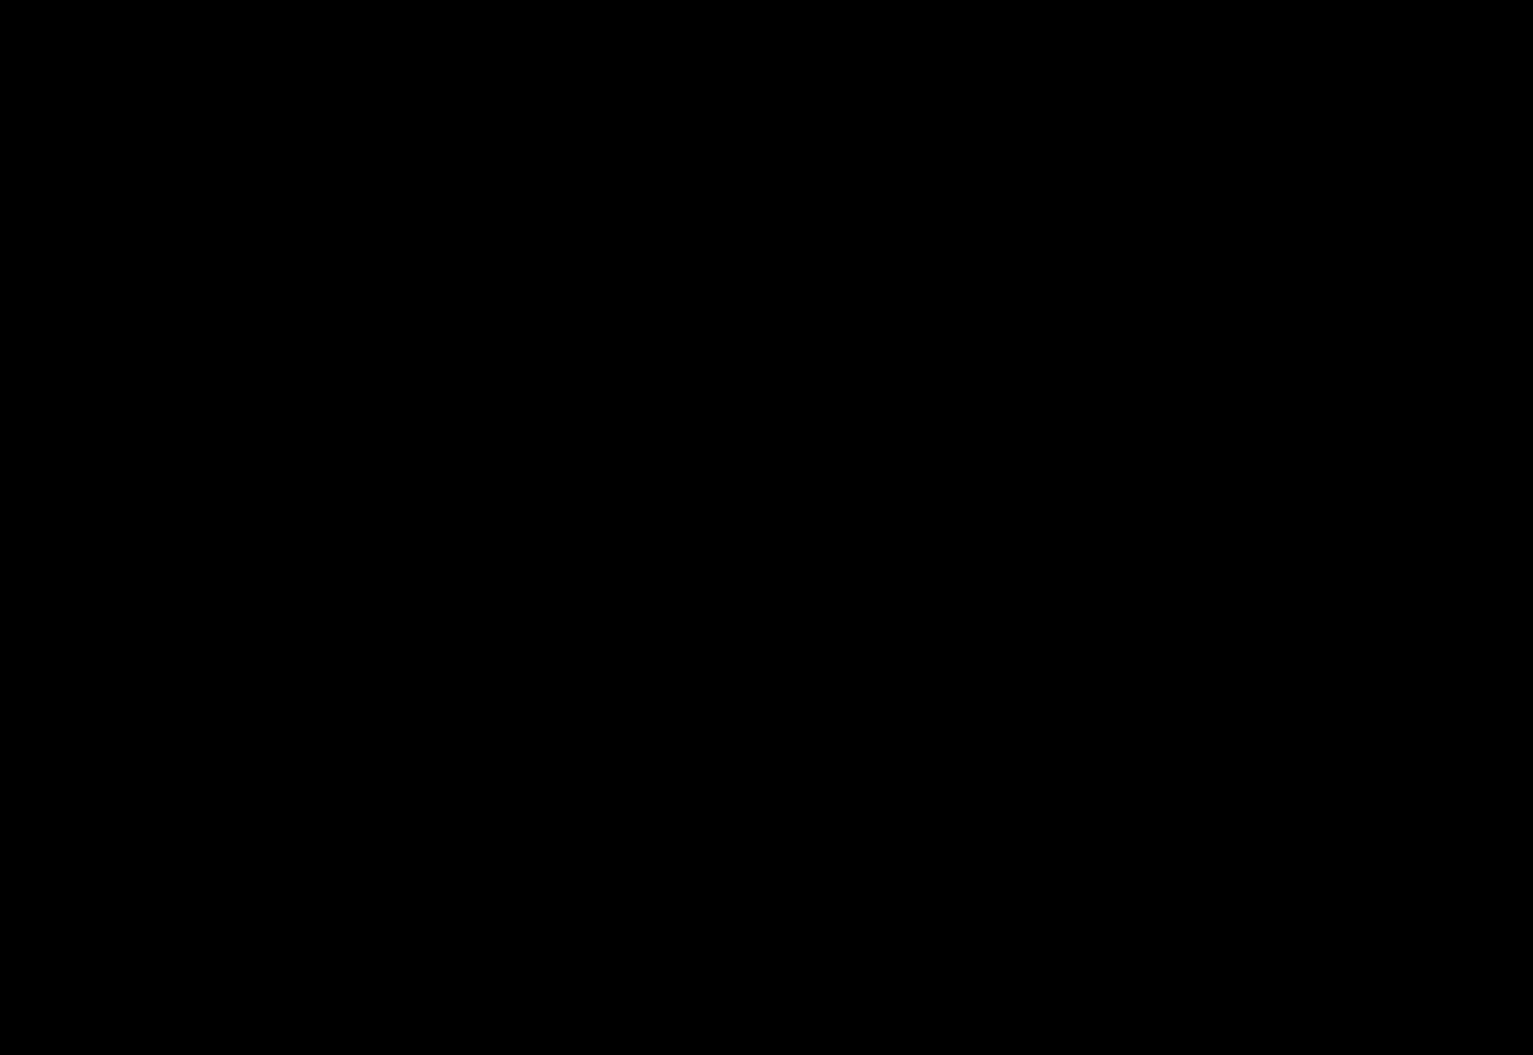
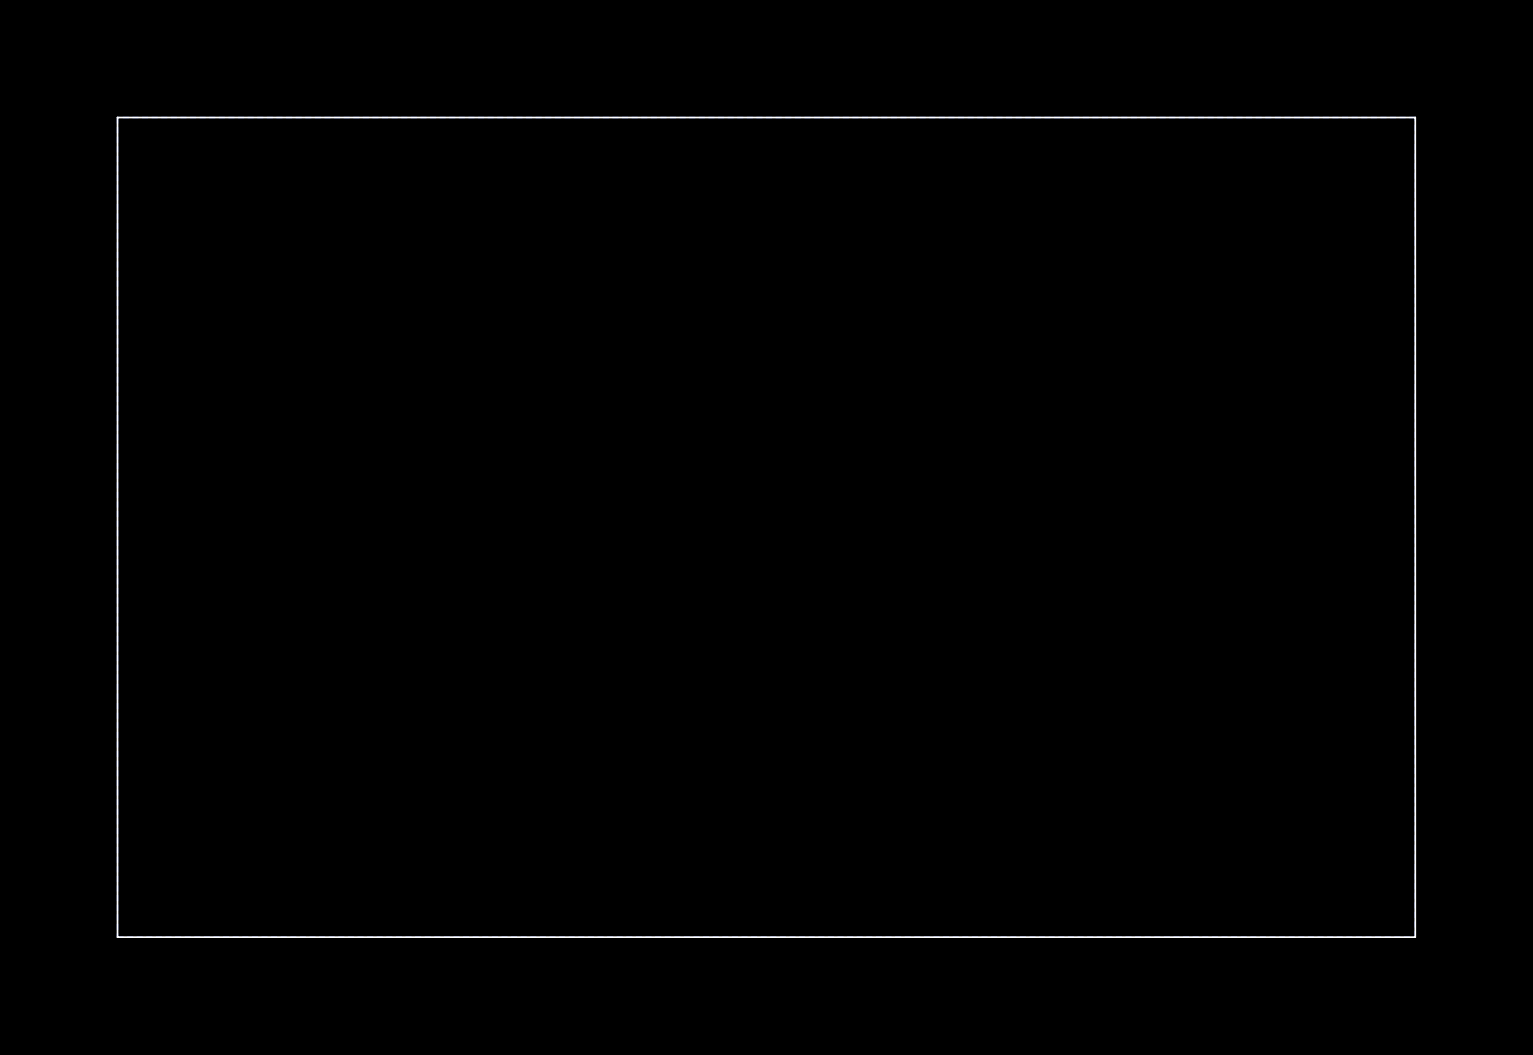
board edge: none -> (1415, 117) (117, 117) (117, 937) (1415, 937) (1415, 117)

